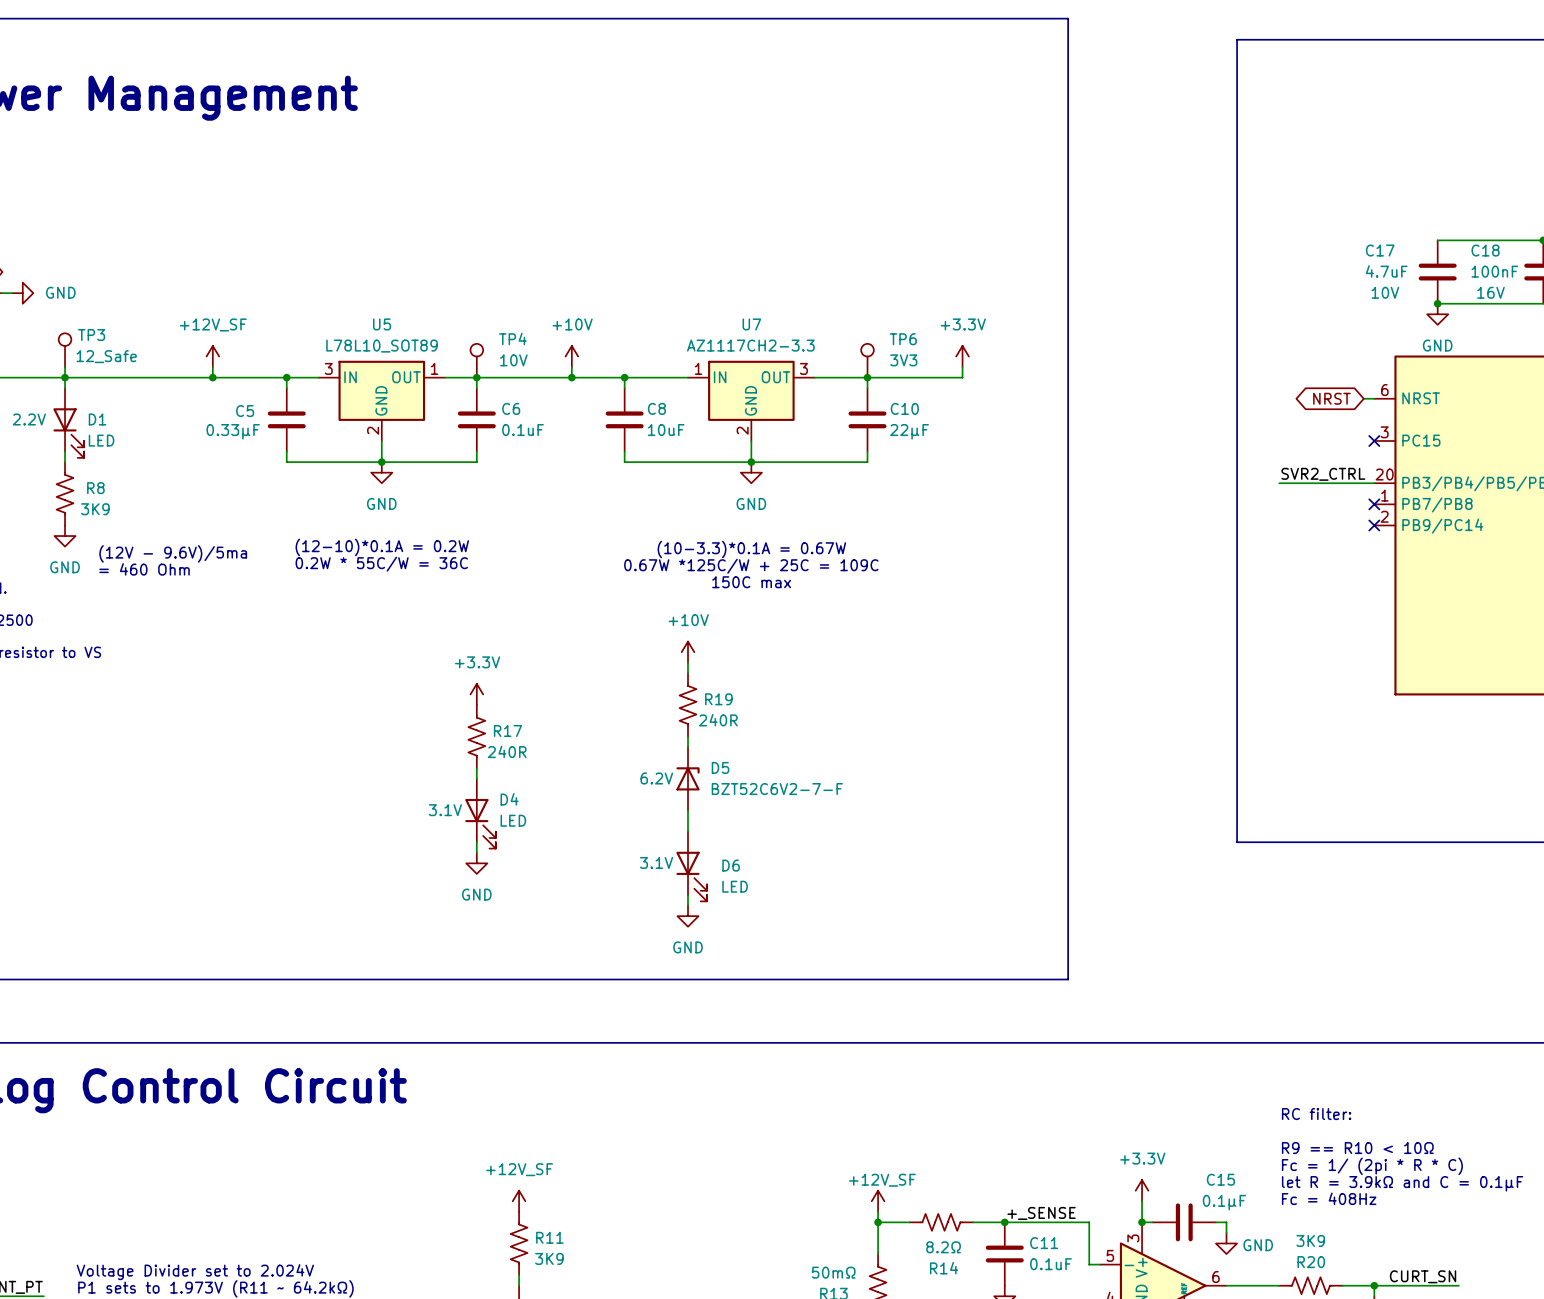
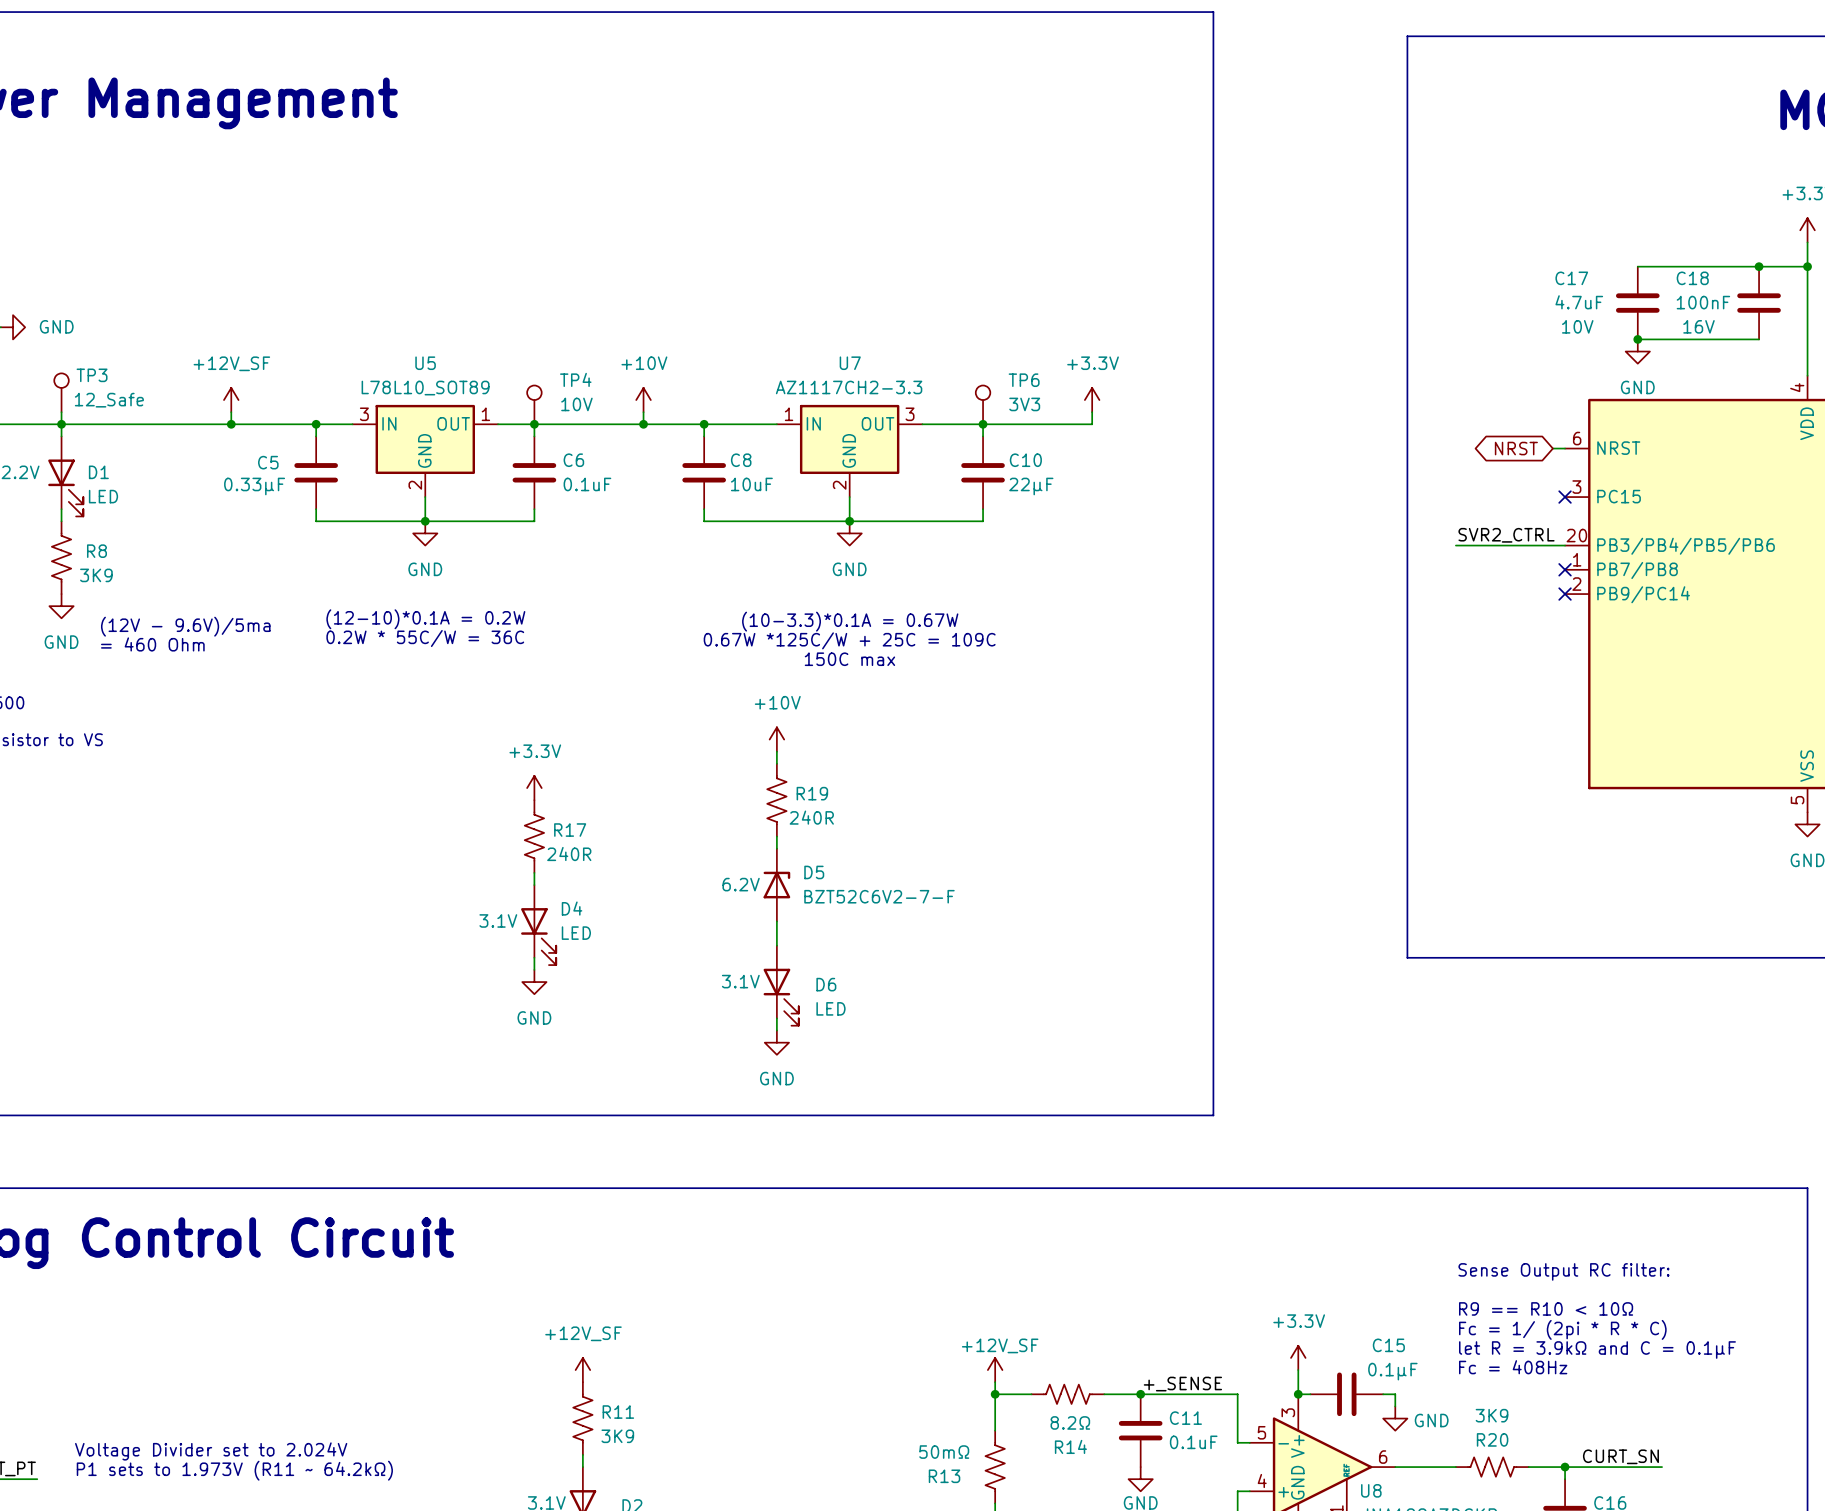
text: RC filter: (1316, 1114) -> Sense Output RC filter: (1563, 1271)

